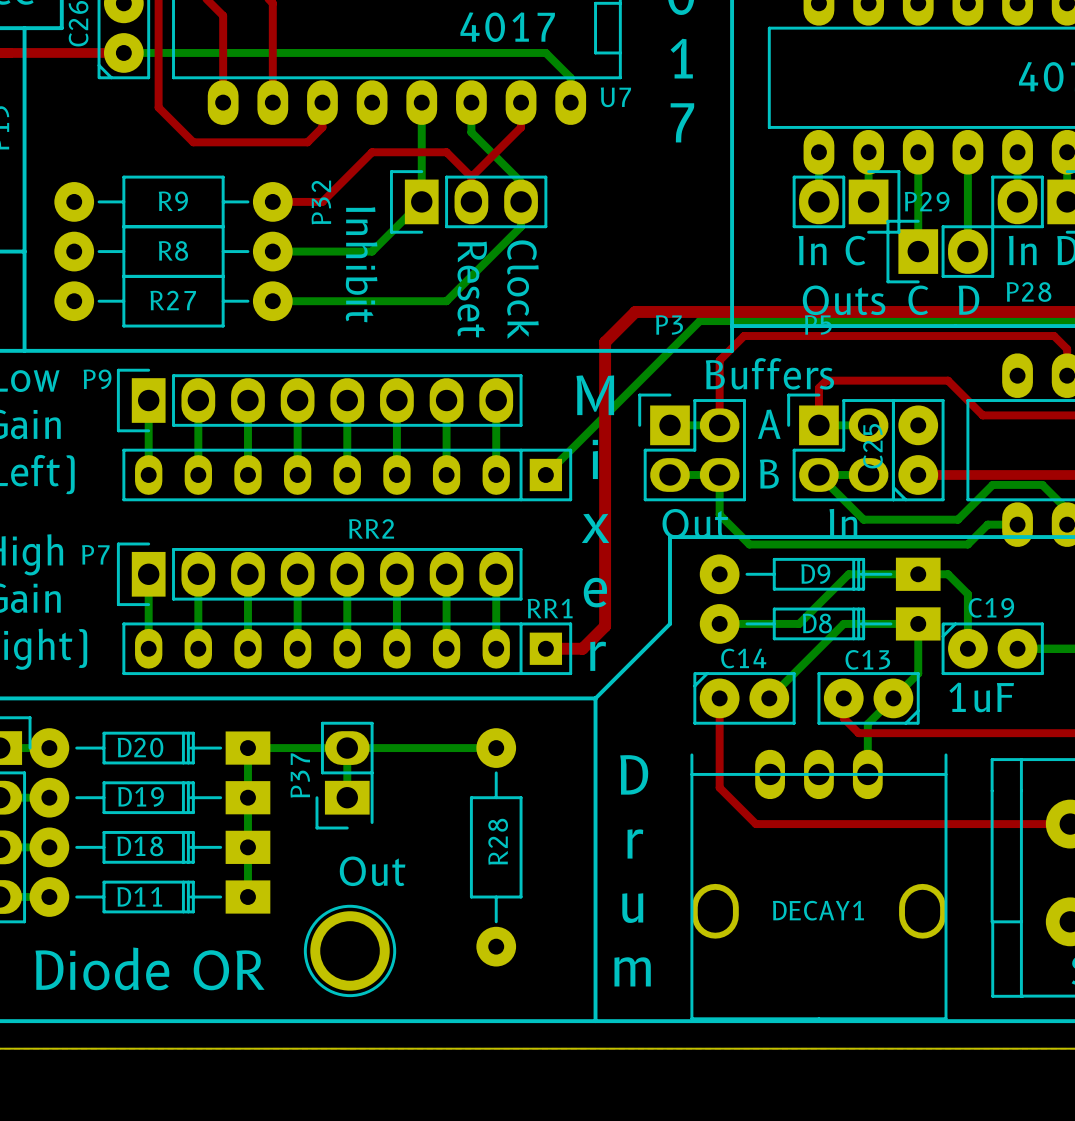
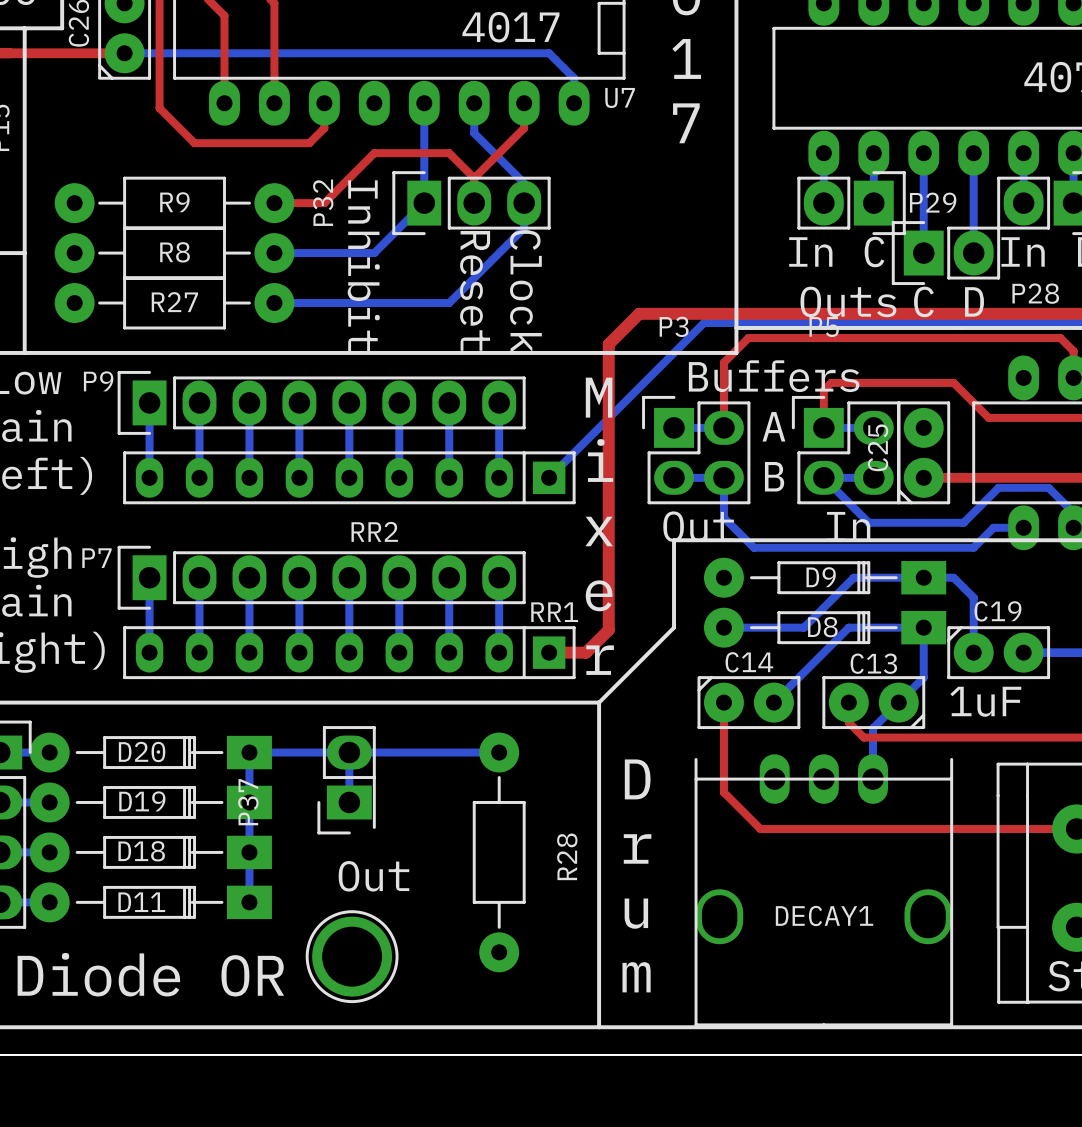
P37 name position: P37 (300, 775) -> P37 (248, 802)
R28 name position: R28 (498, 841) -> R28 (567, 856)

